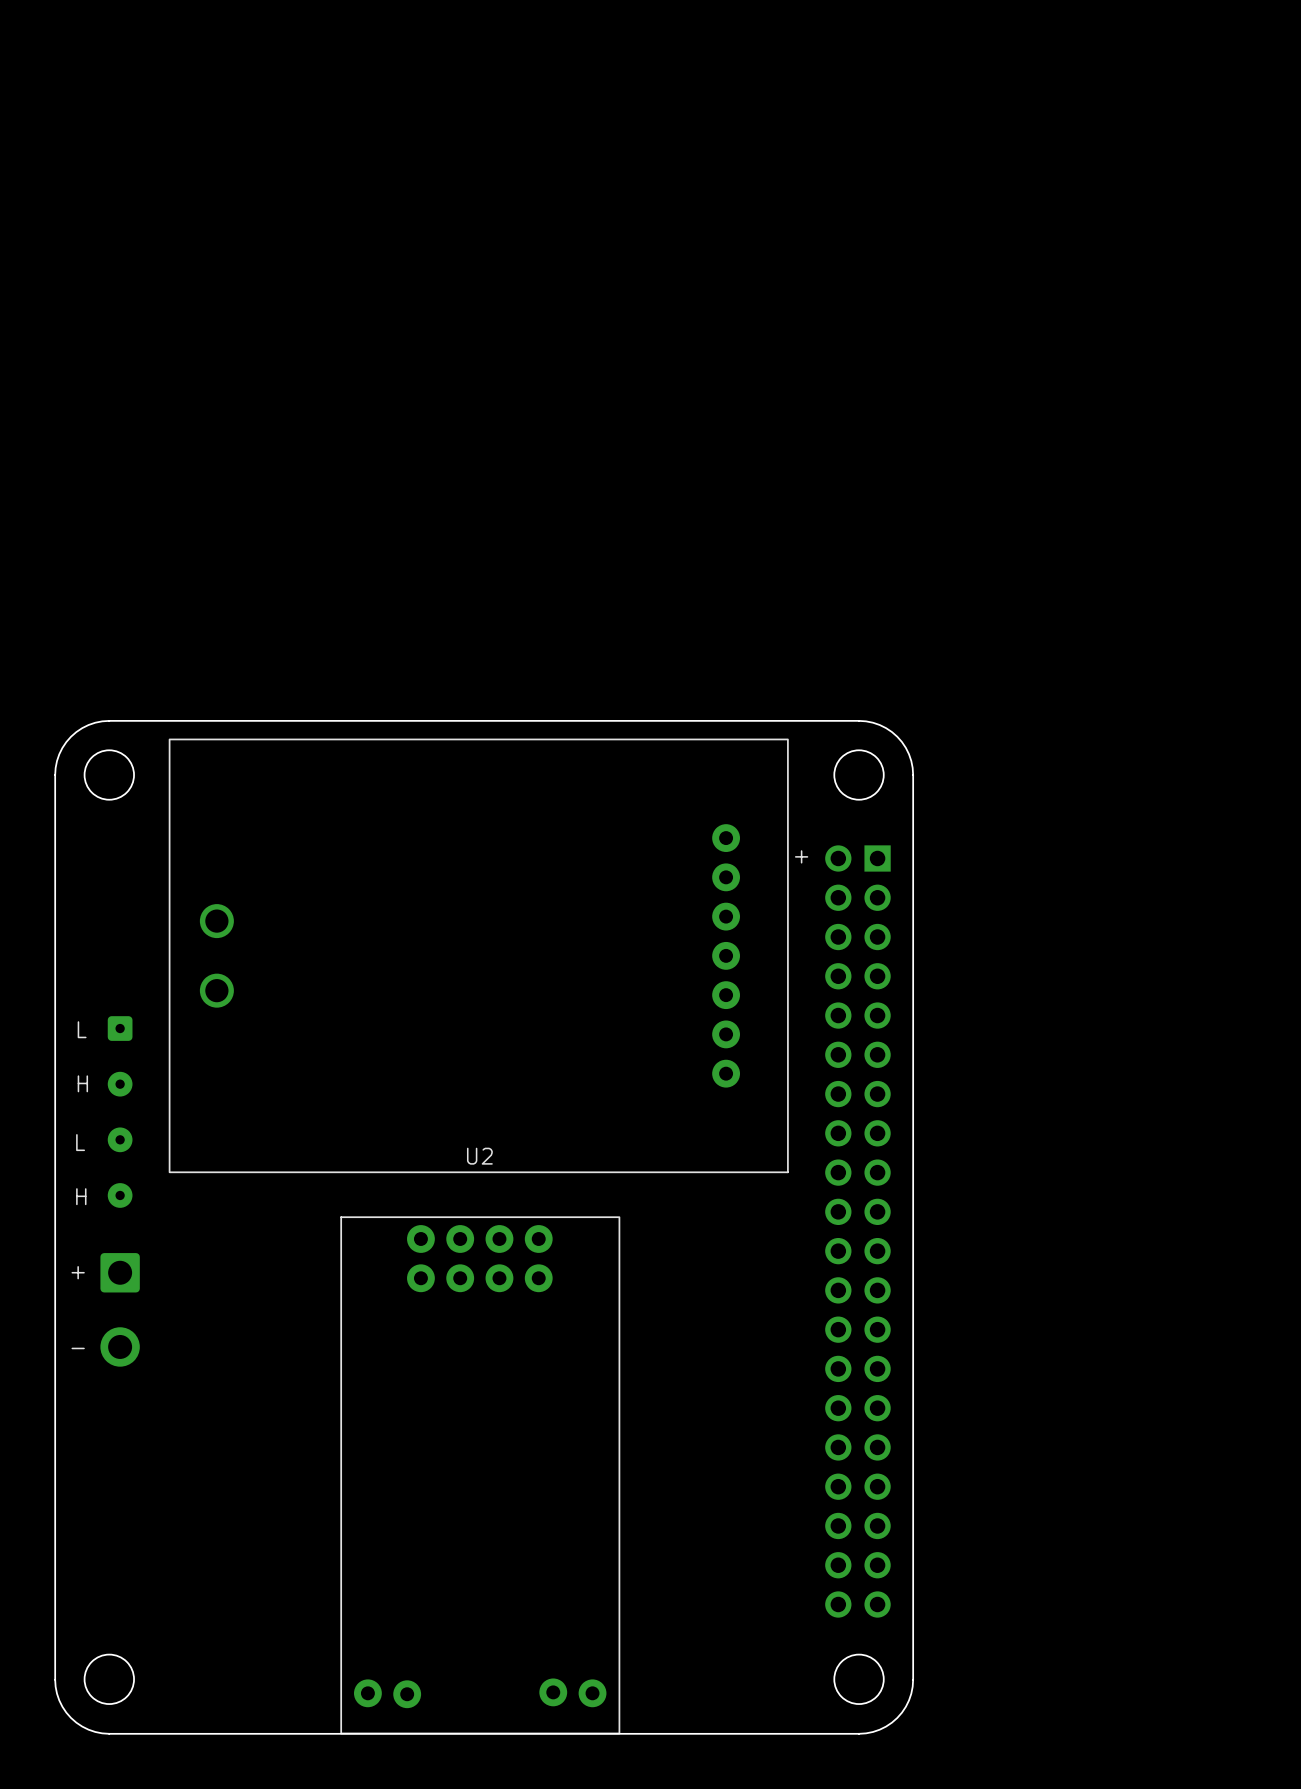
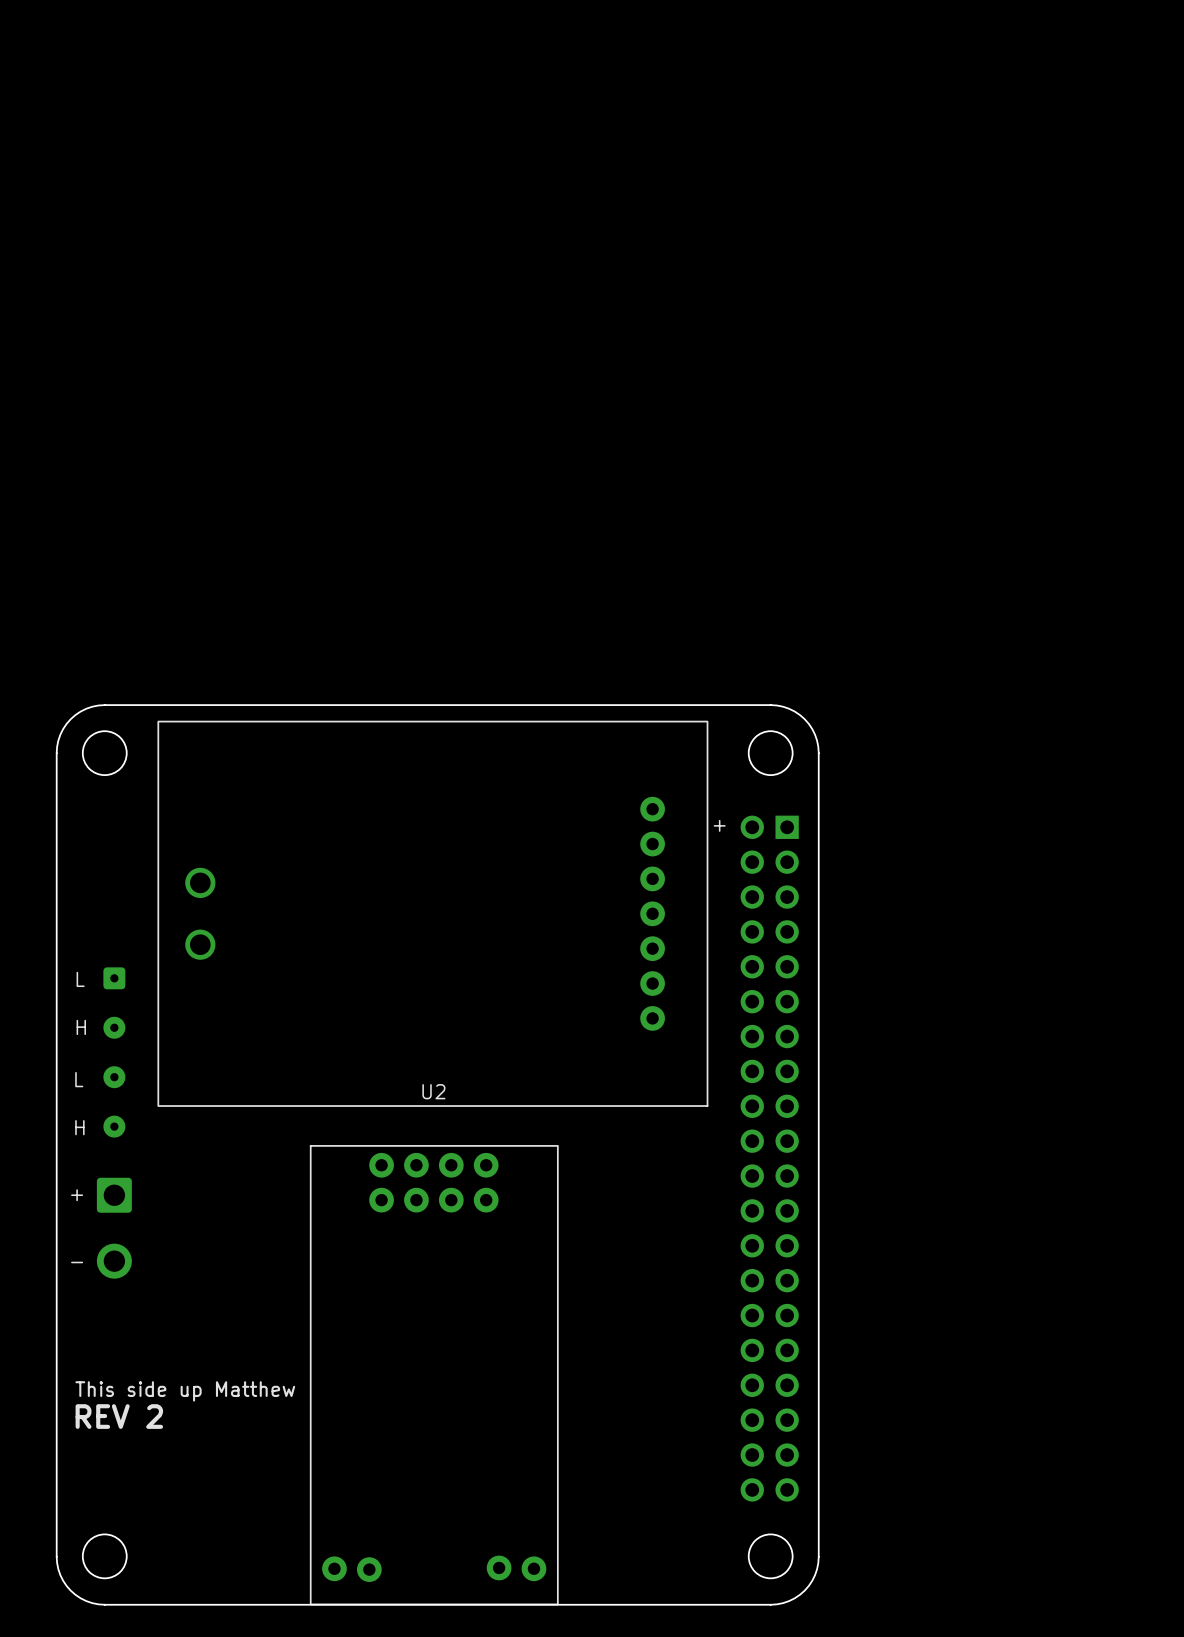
text: none -> This side up Matthew (185, 1391)
text: none -> REV 2 (119, 1416)

